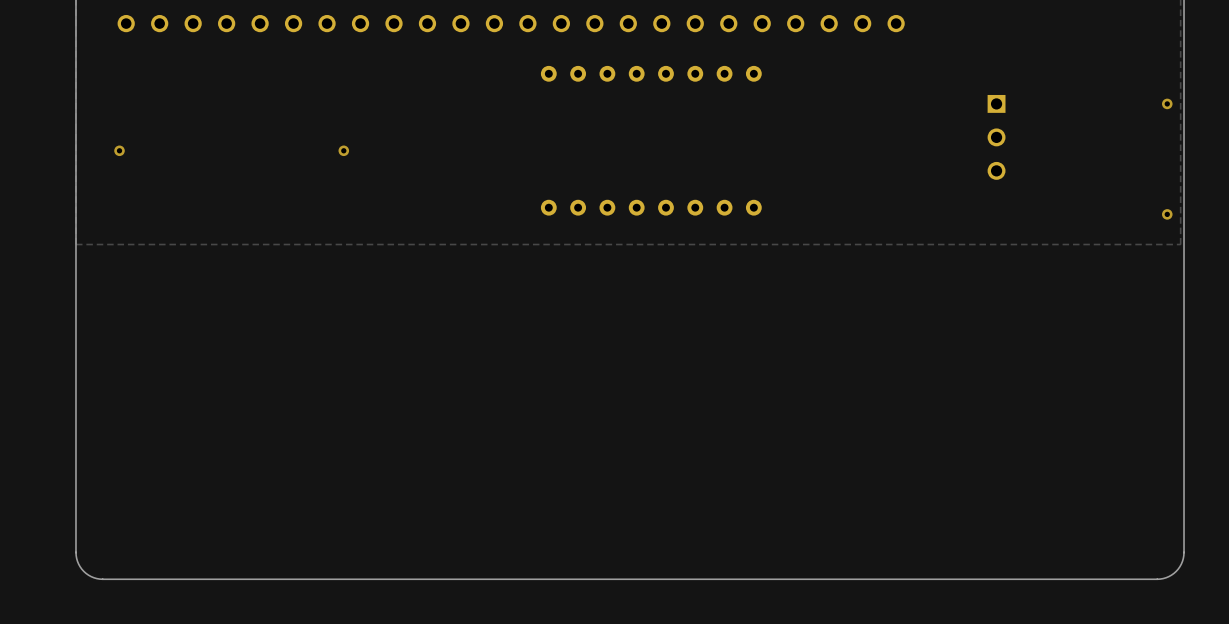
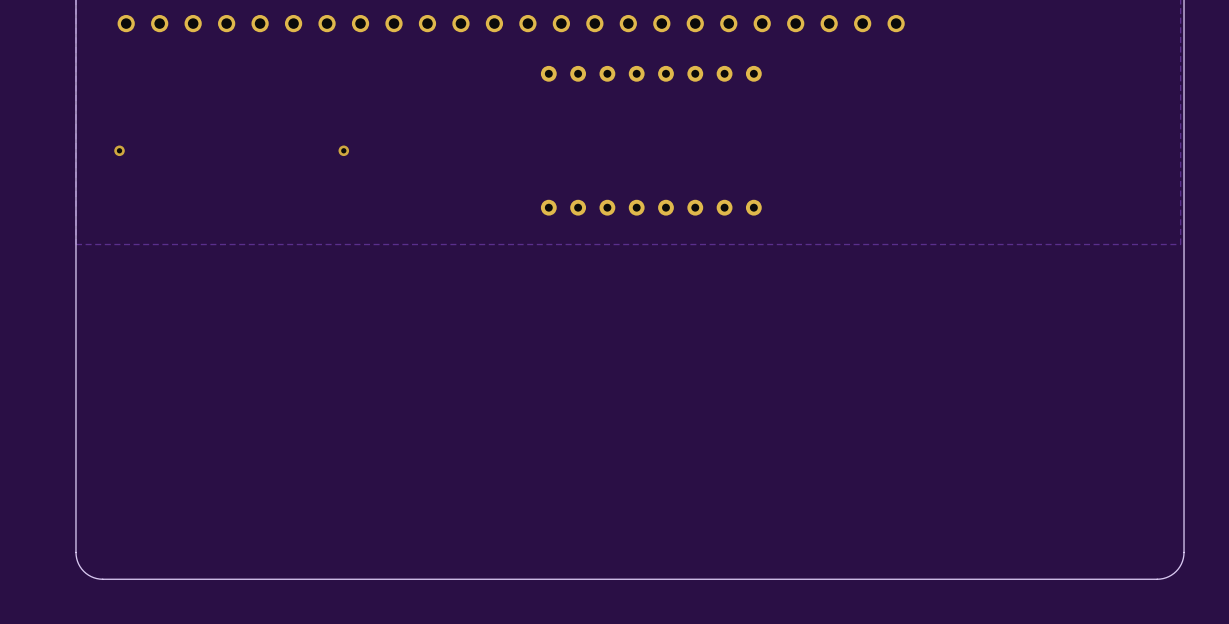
via: (1167, 103) -> none
part: (996, 137) -> none
via: (1167, 214) -> none

